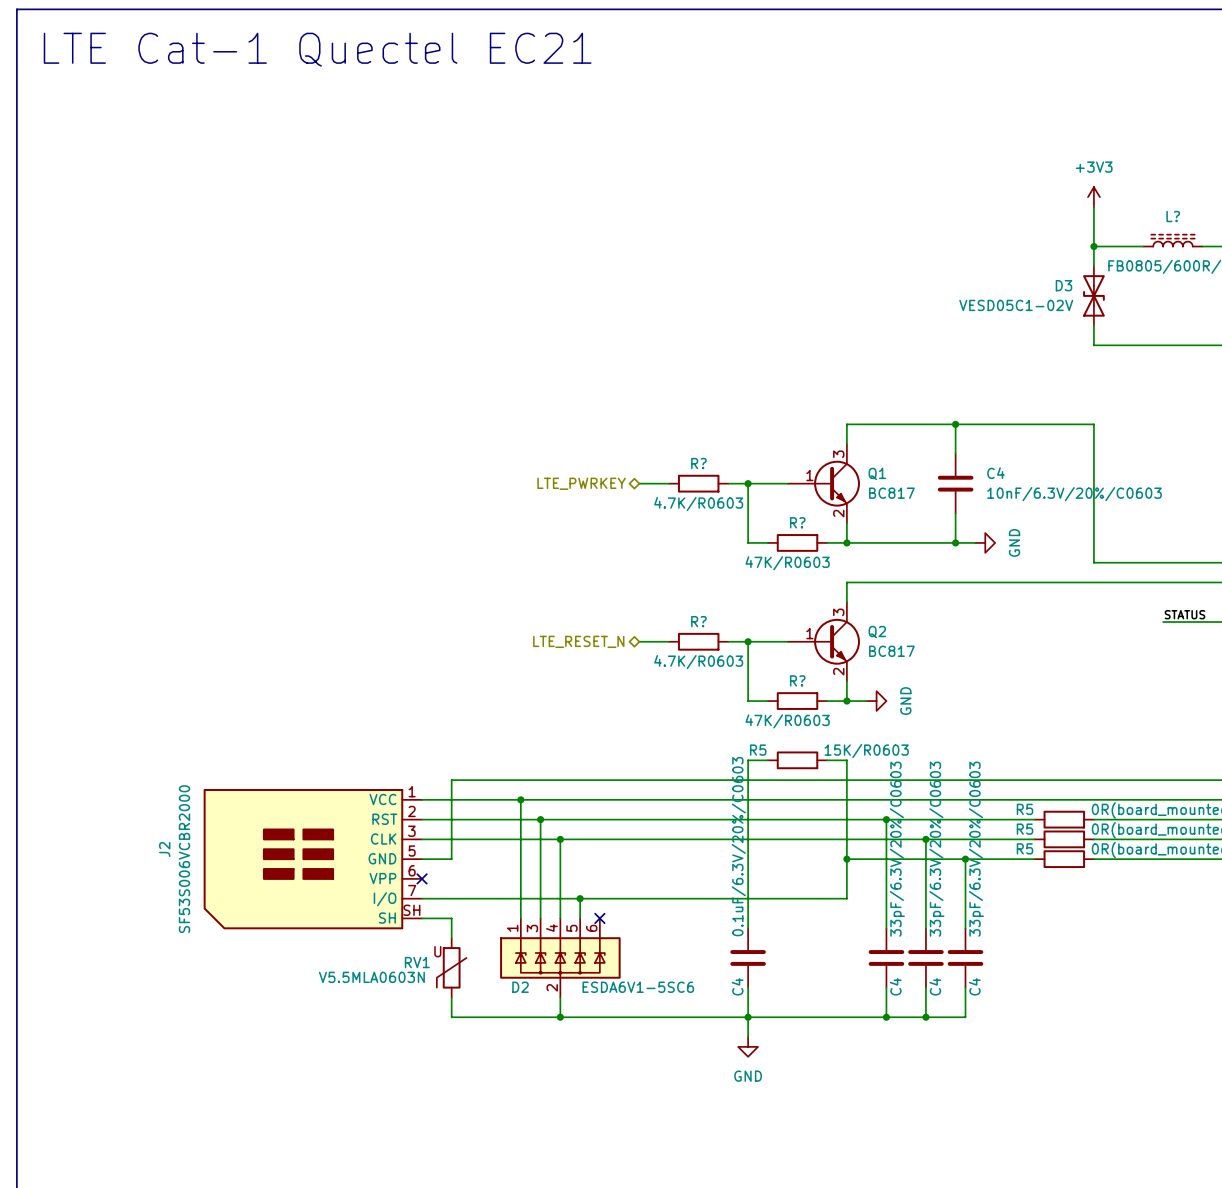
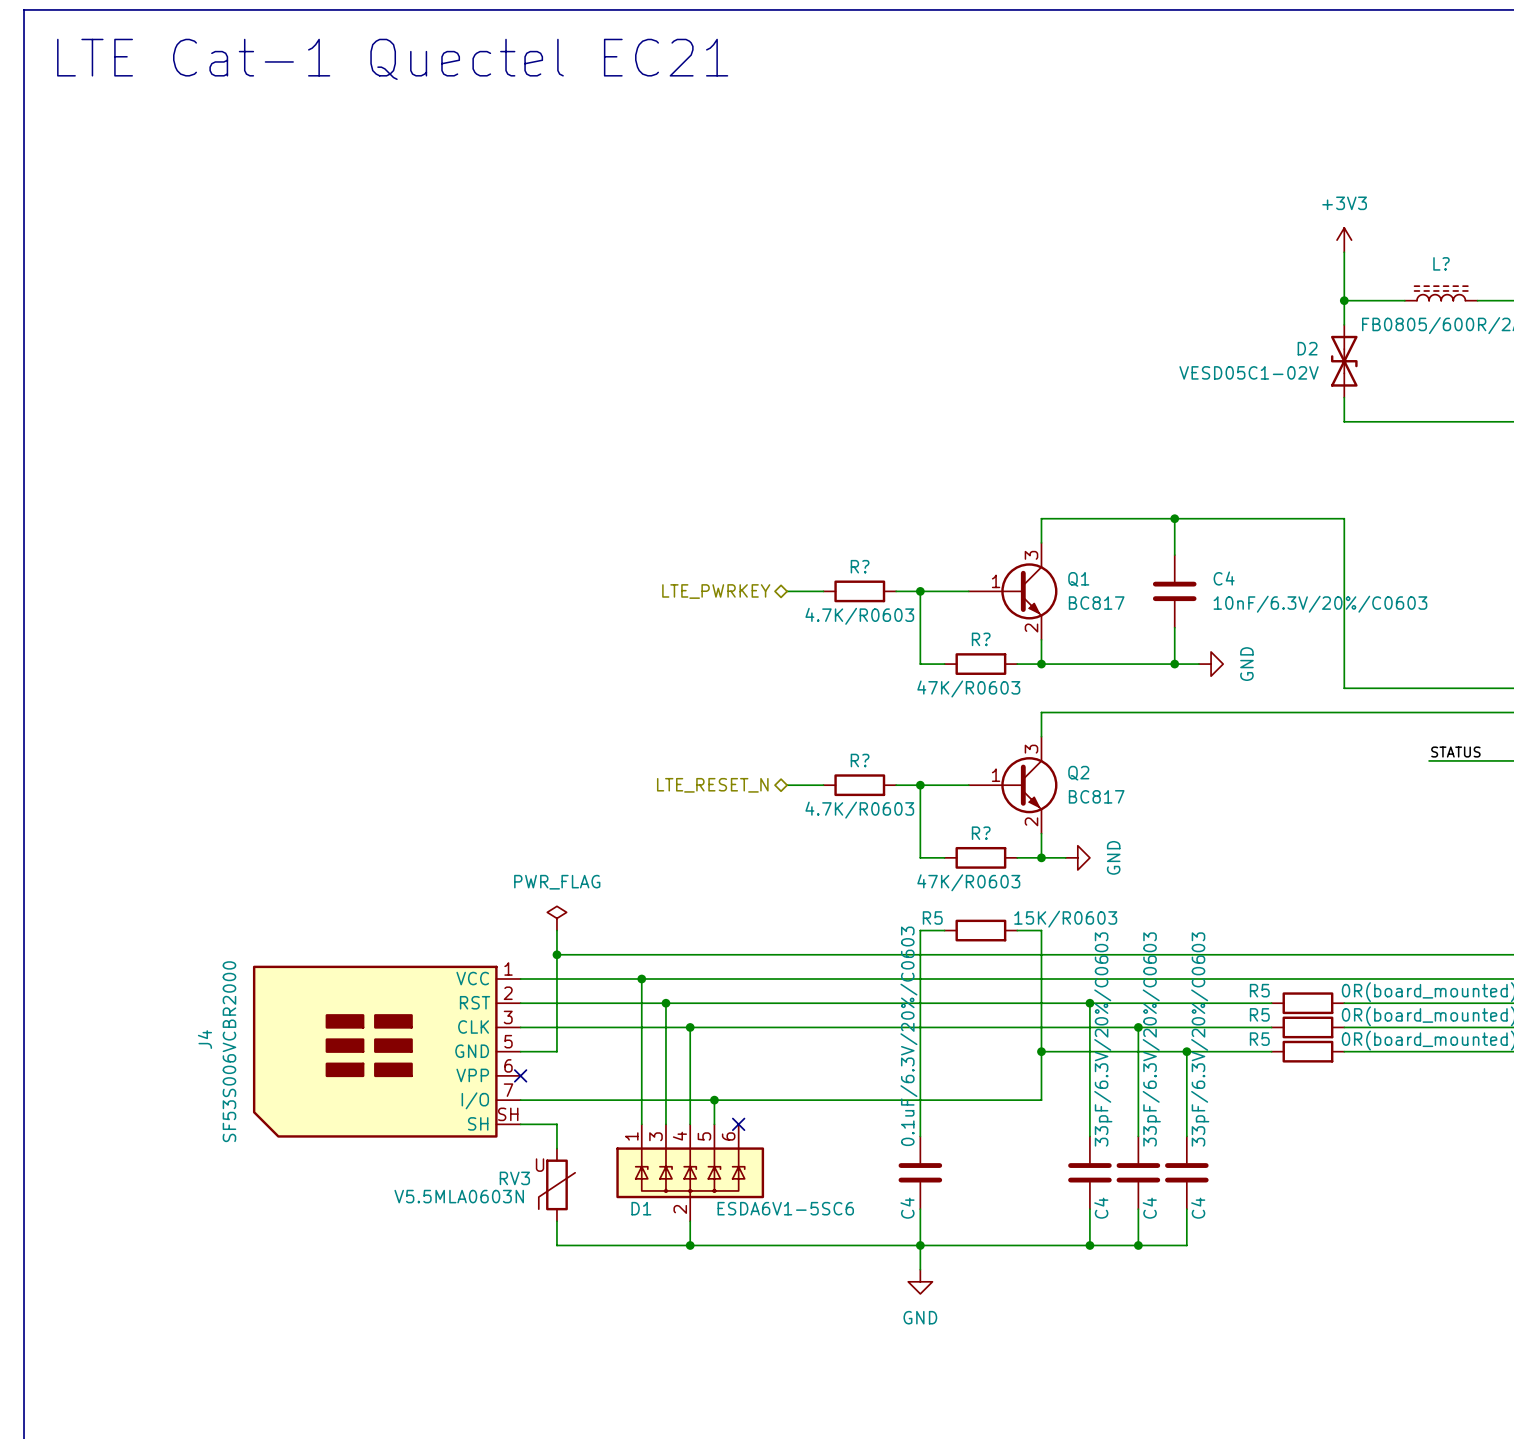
D3 name: D3 (1063, 285) -> D2 (1307, 348)
power symbol: none -> PWR_FLAG (556, 918)
wire: none -> (556, 930) (556, 954)
junction: none -> (556, 954)
J2 name: J2 (164, 849) -> J4 (204, 1039)
RV1 name: RV1 (417, 962) -> RV3 (514, 1178)
D2 name: D2 (520, 987) -> D1 (641, 1208)

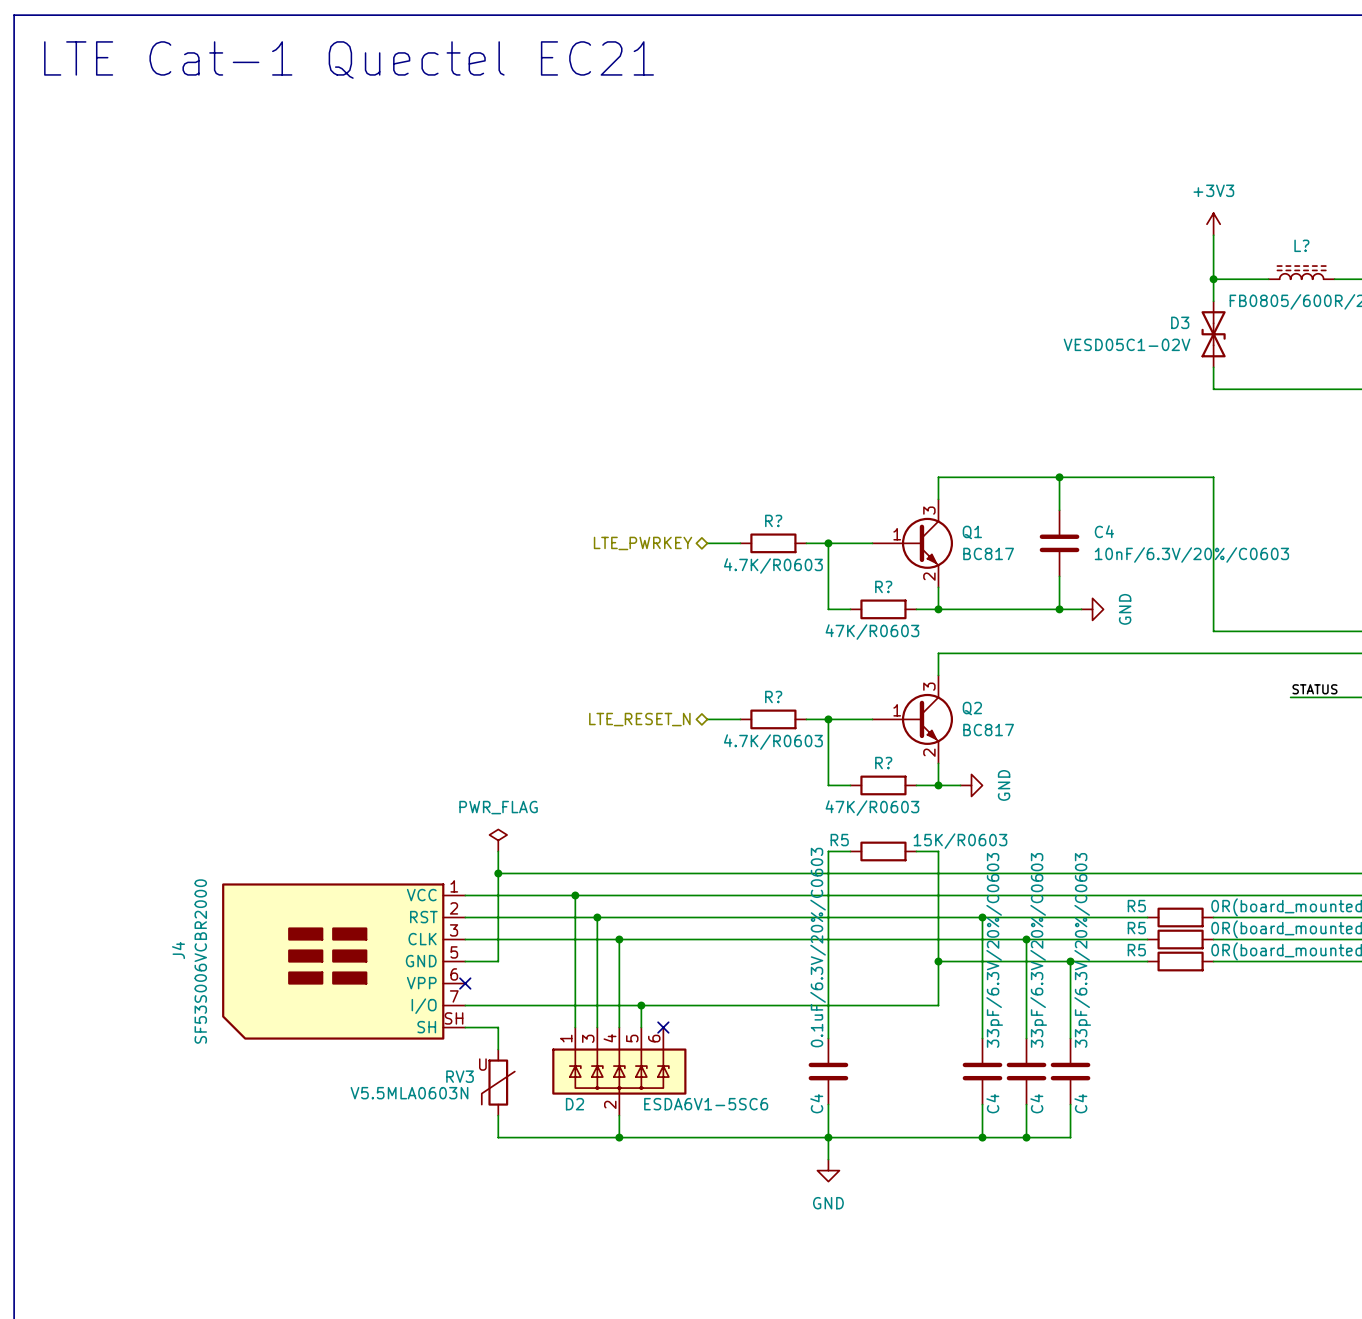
D2 name: D2 (1307, 348) -> D3 (1180, 322)
D1 name: D1 (641, 1208) -> D2 (574, 1104)

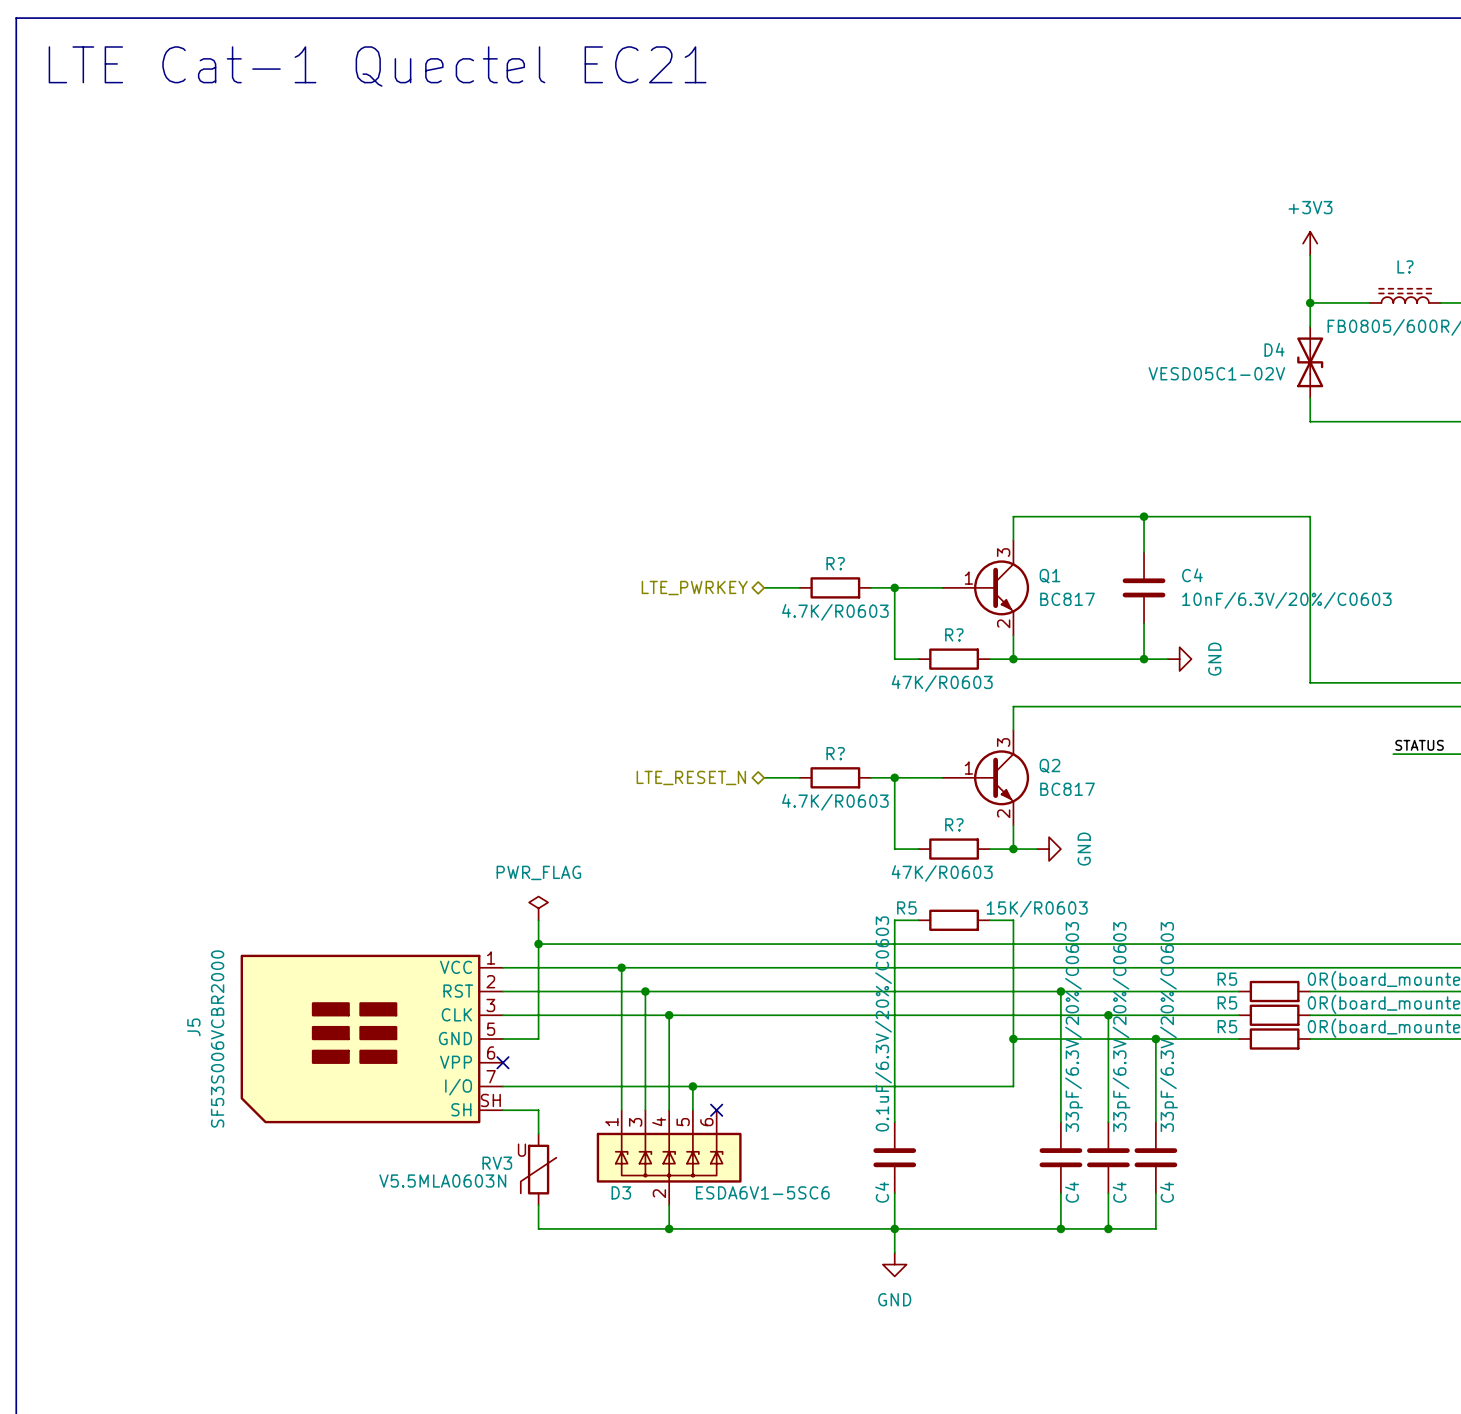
D3 name: D3 (1180, 322) -> D4 (1274, 349)
J4 name: J4 (178, 950) -> J5 (193, 1027)
D2 name: D2 (574, 1104) -> D3 (621, 1192)

